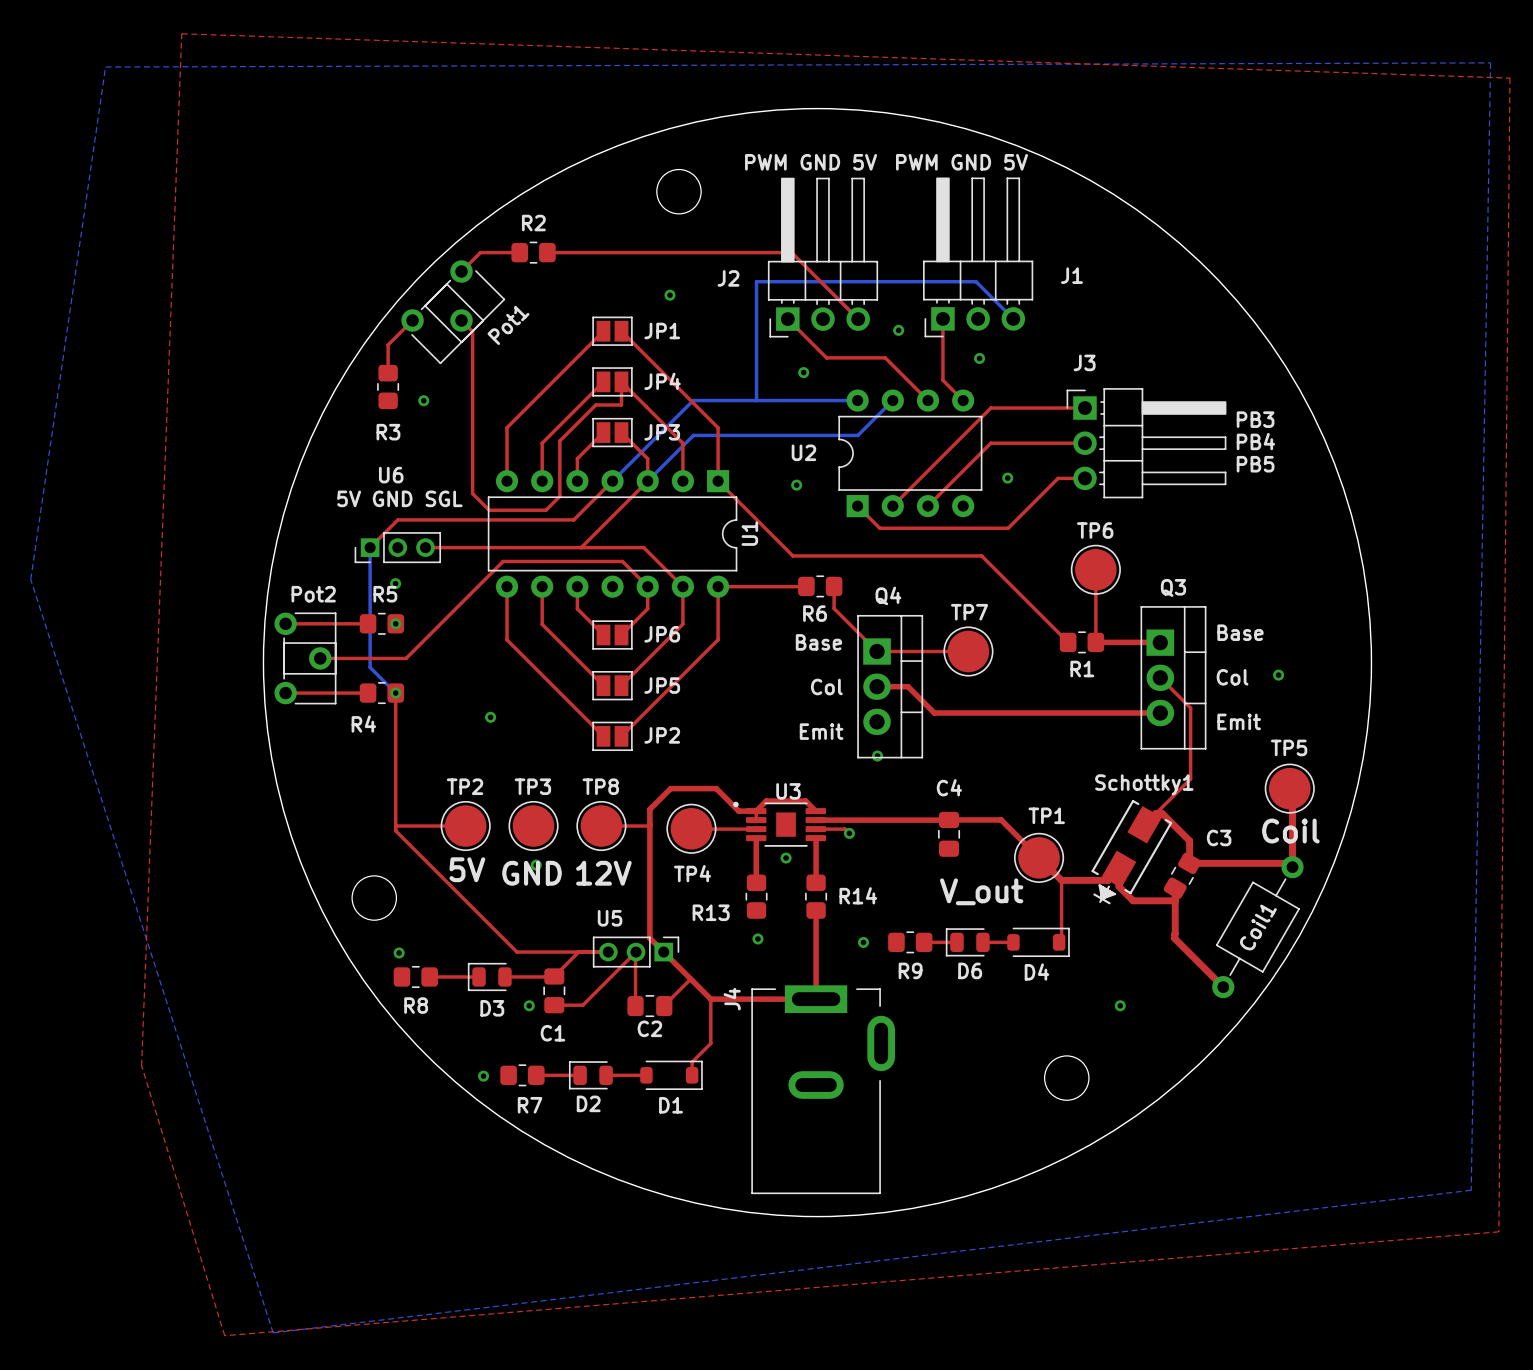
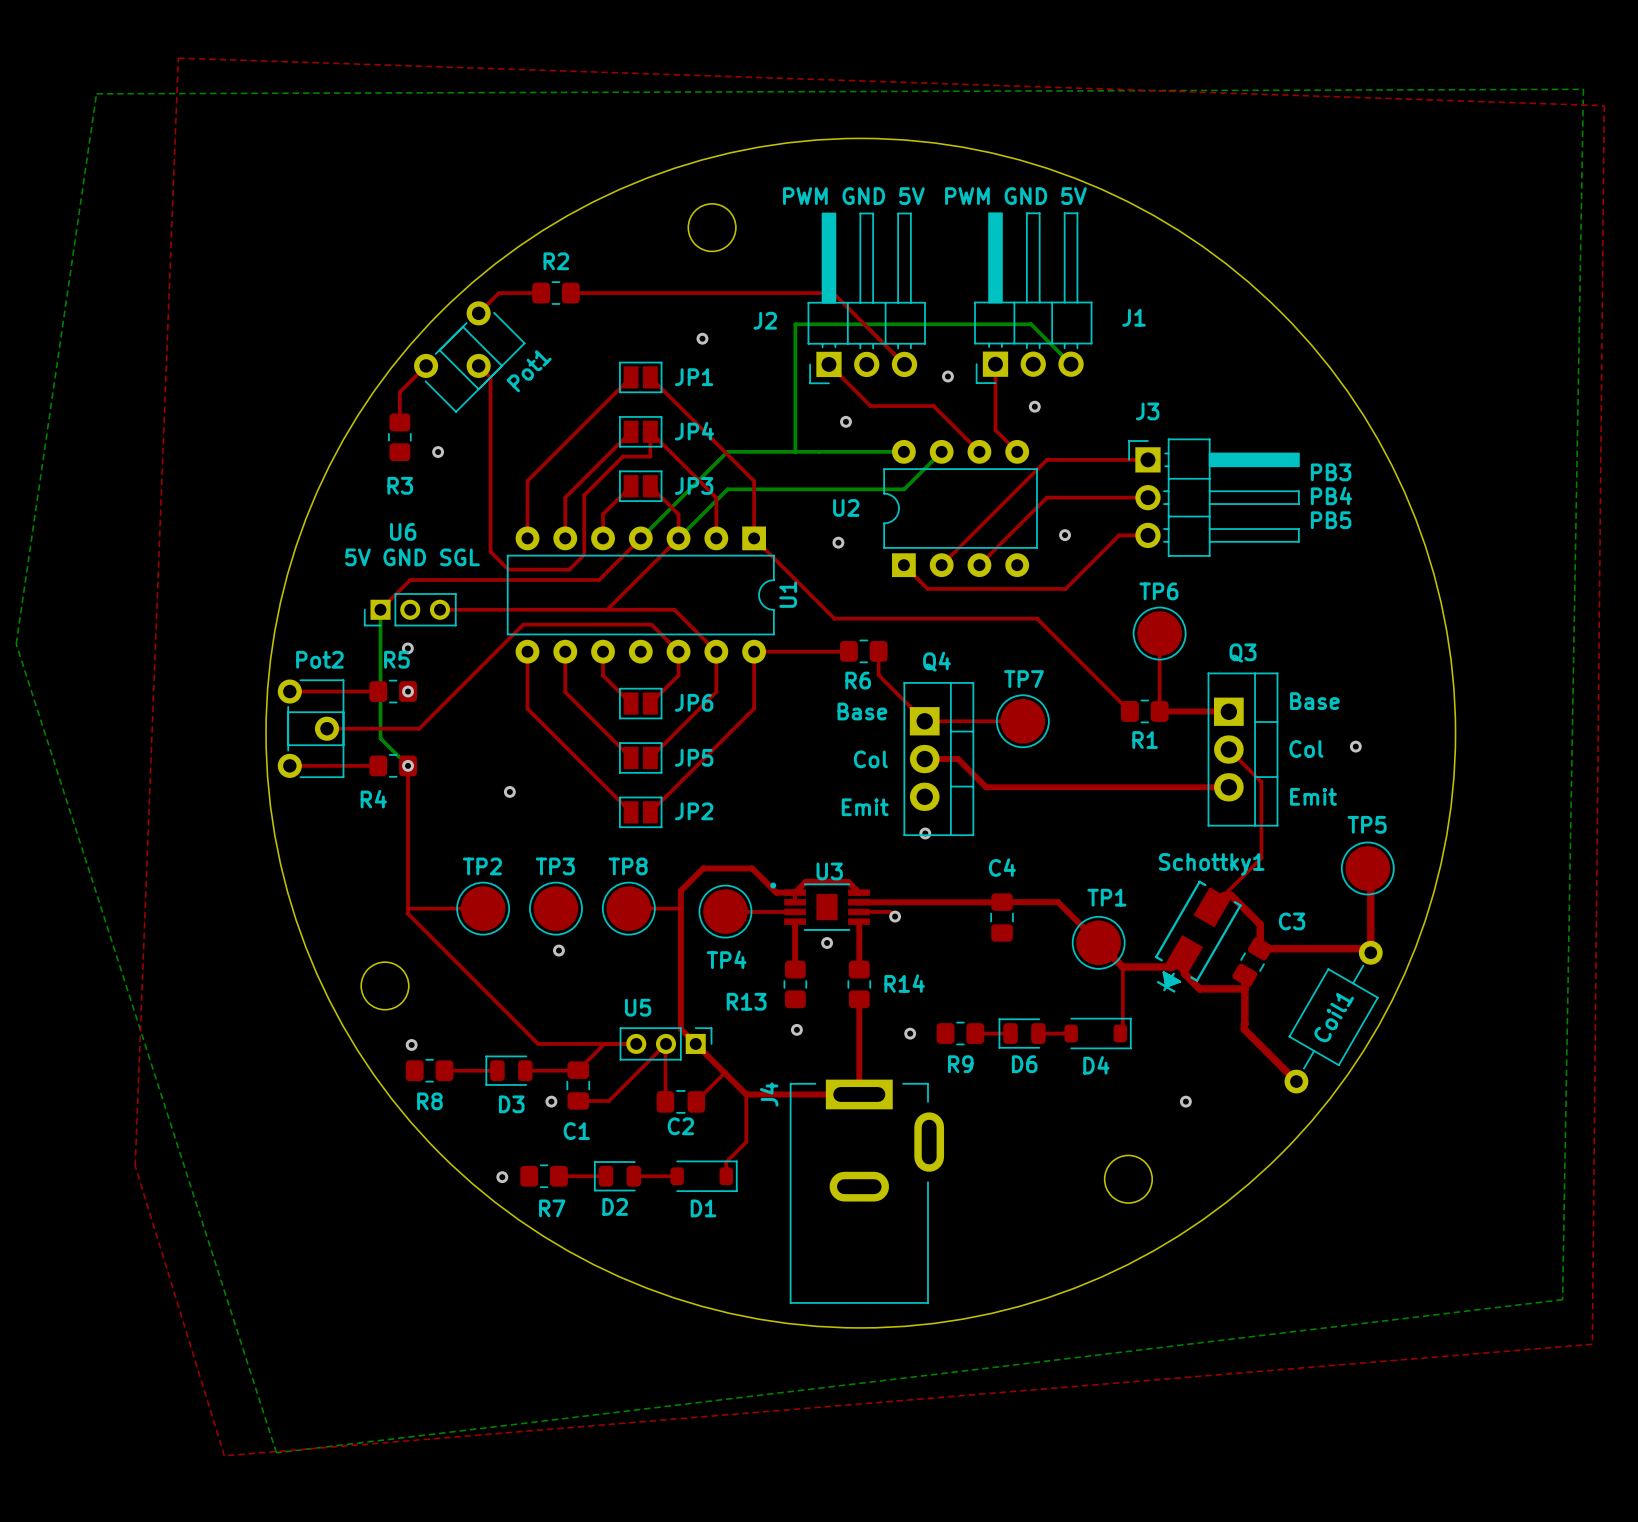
text: Coil (1290, 831) -> none
text: 5V (467, 869) -> none
text: GND (532, 873) -> none
text: 12V (603, 873) -> none
text: V_out (981, 891) -> none

